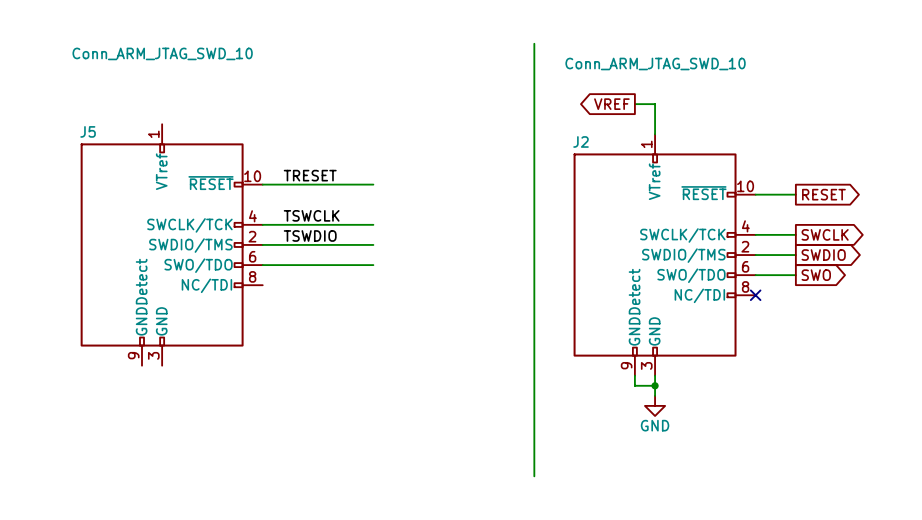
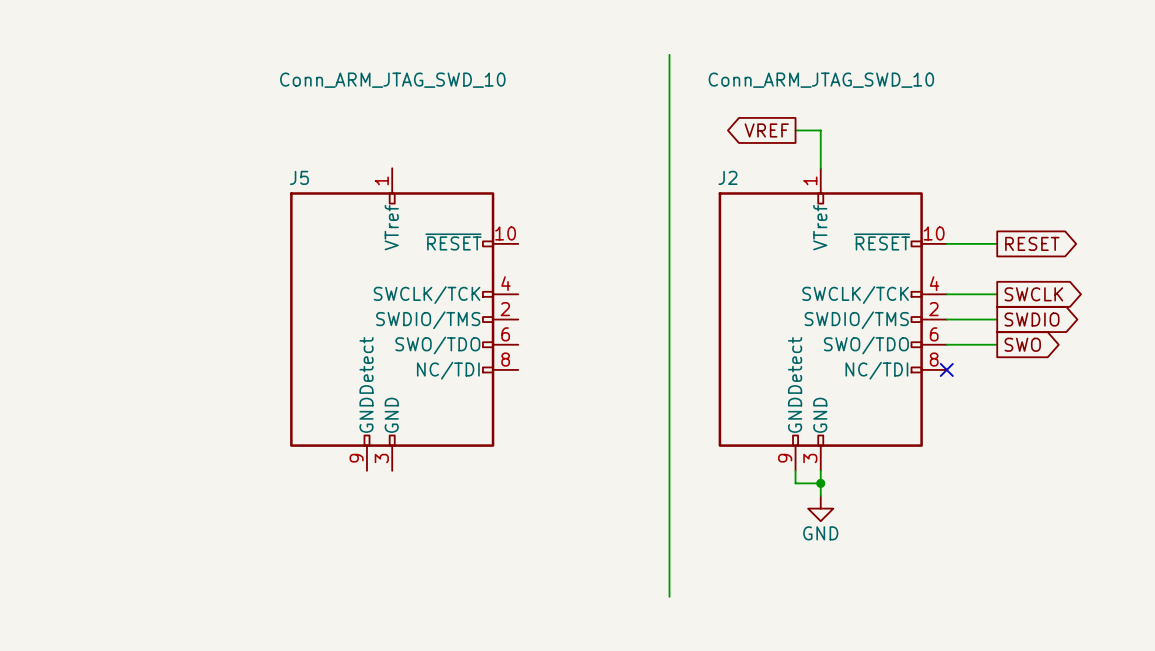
label: TRESET (310, 175) -> none
wire: (262, 184) (373, 184) -> none
label: TSWCLK (311, 215) -> none
wire: (262, 224) (373, 224) -> none
label: TSWDIO (310, 235) -> none
J5 position: (171, 244) -> (404, 319)
wire: (262, 244) (373, 244) -> none
wire: (262, 265) (373, 265) -> none

